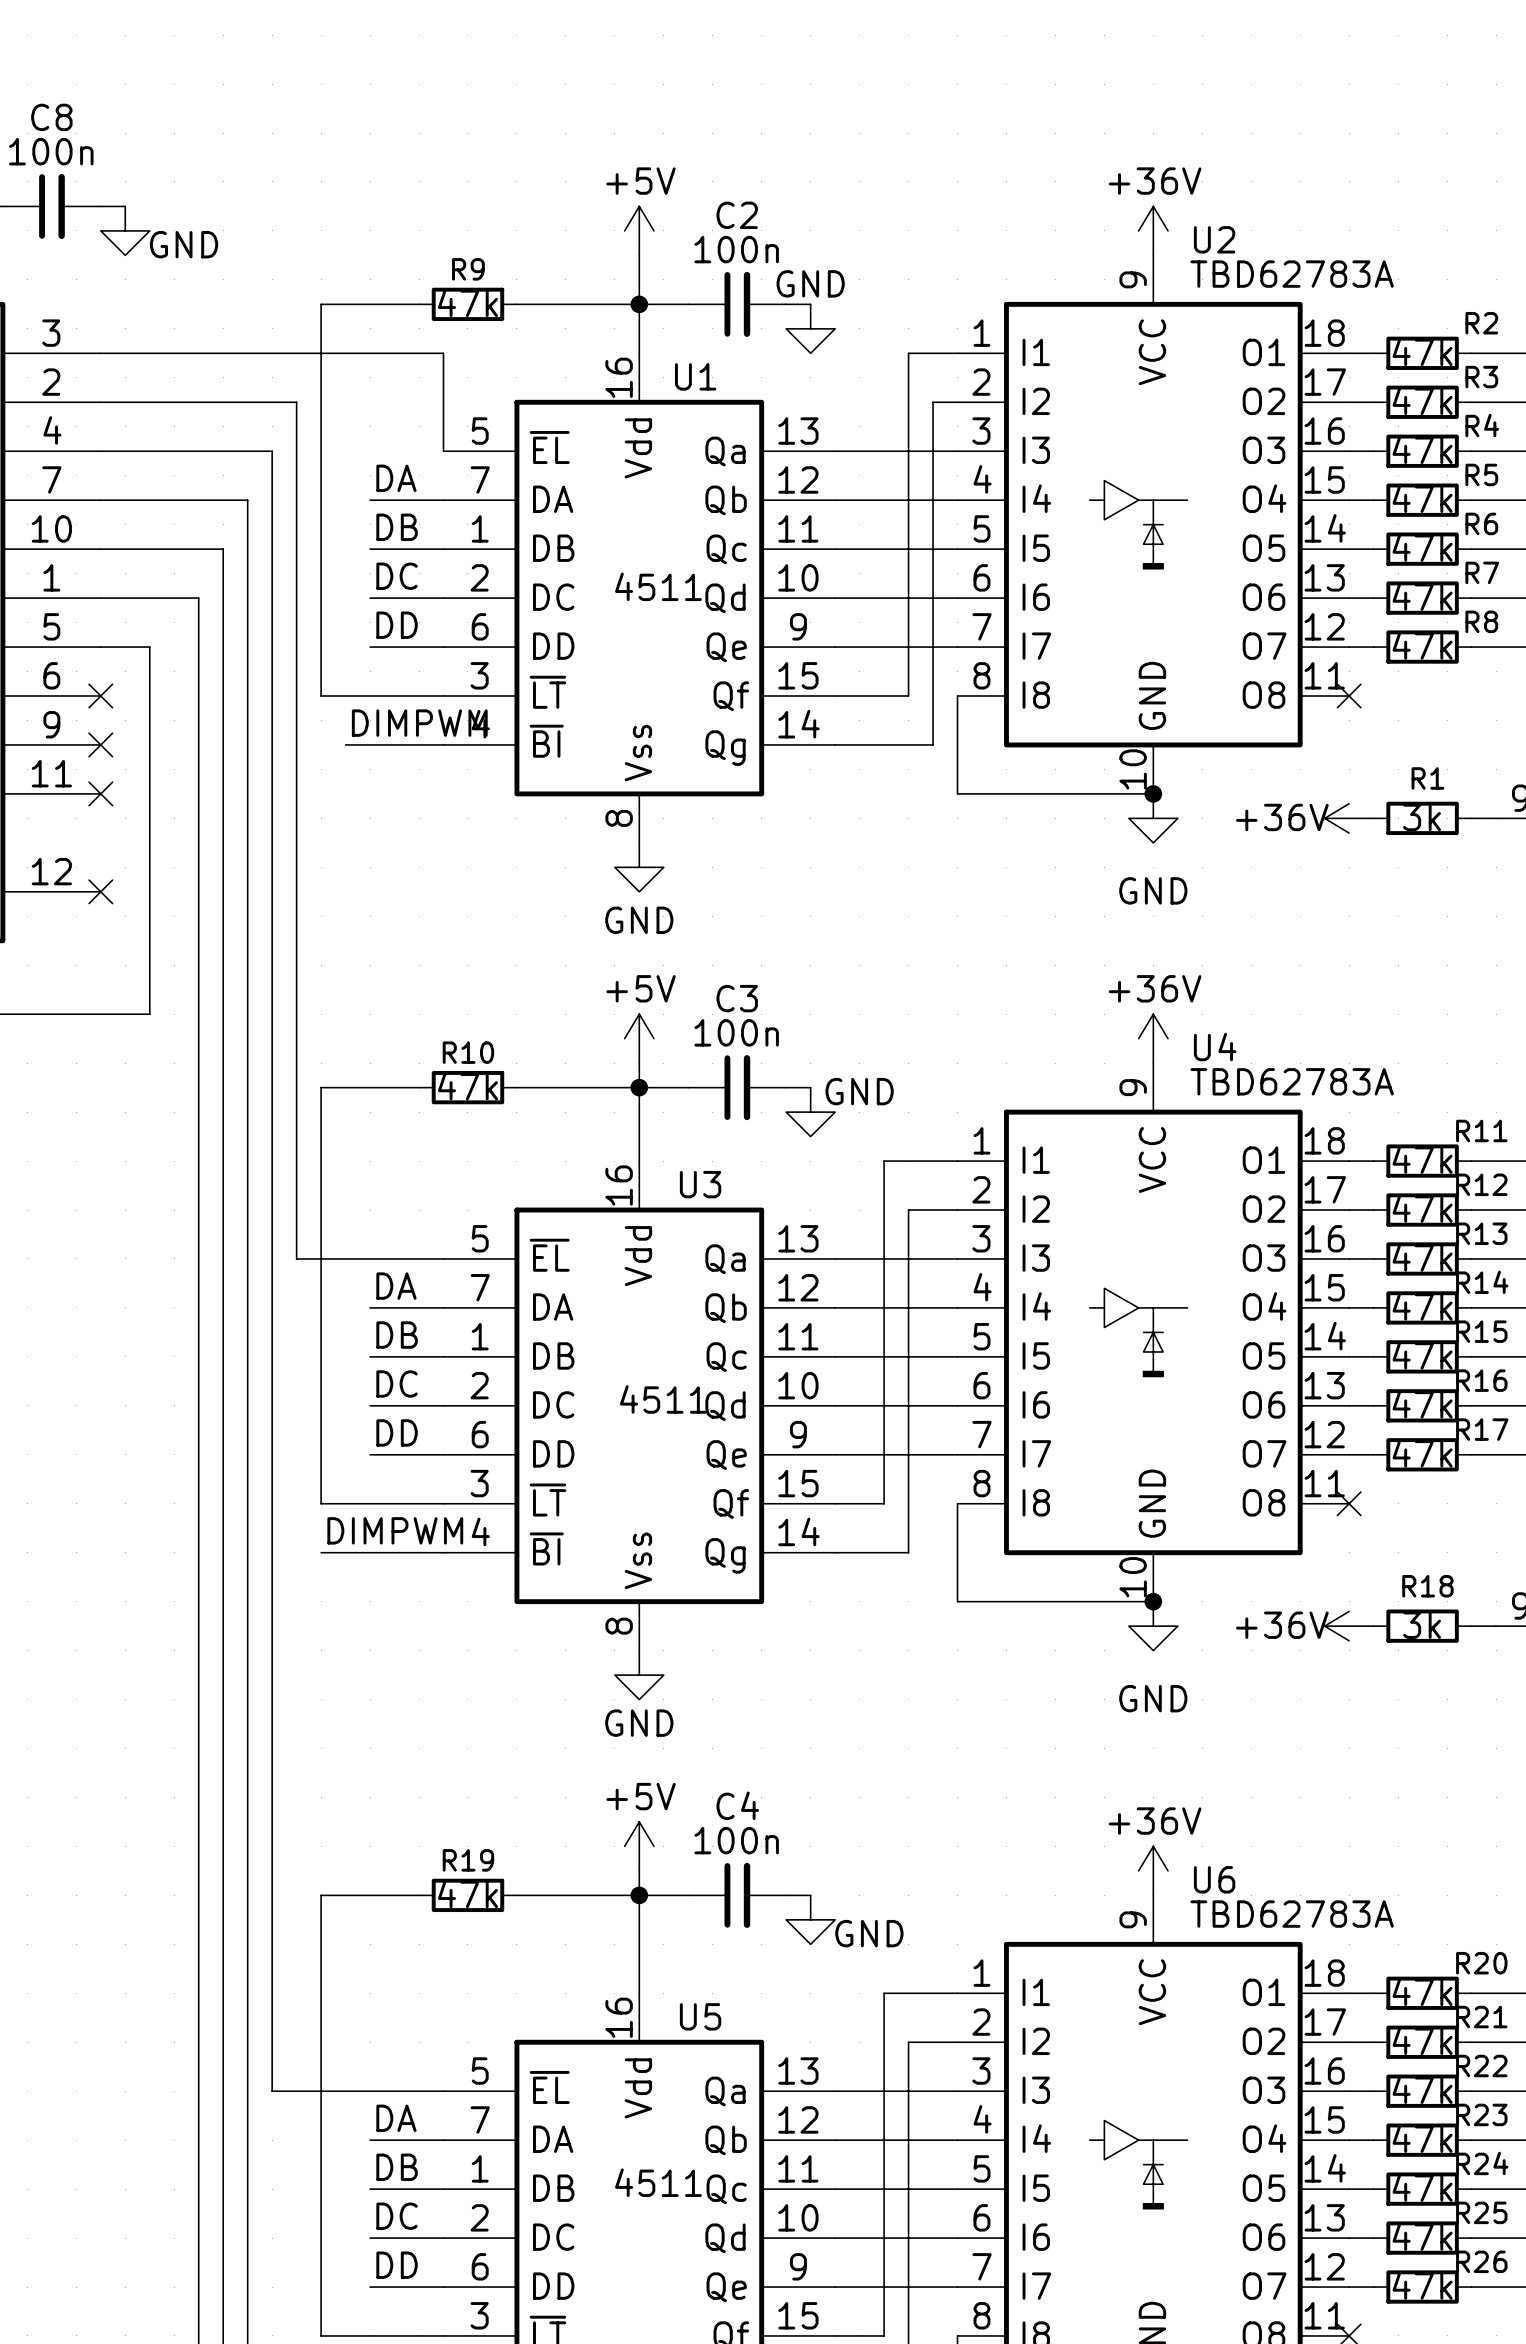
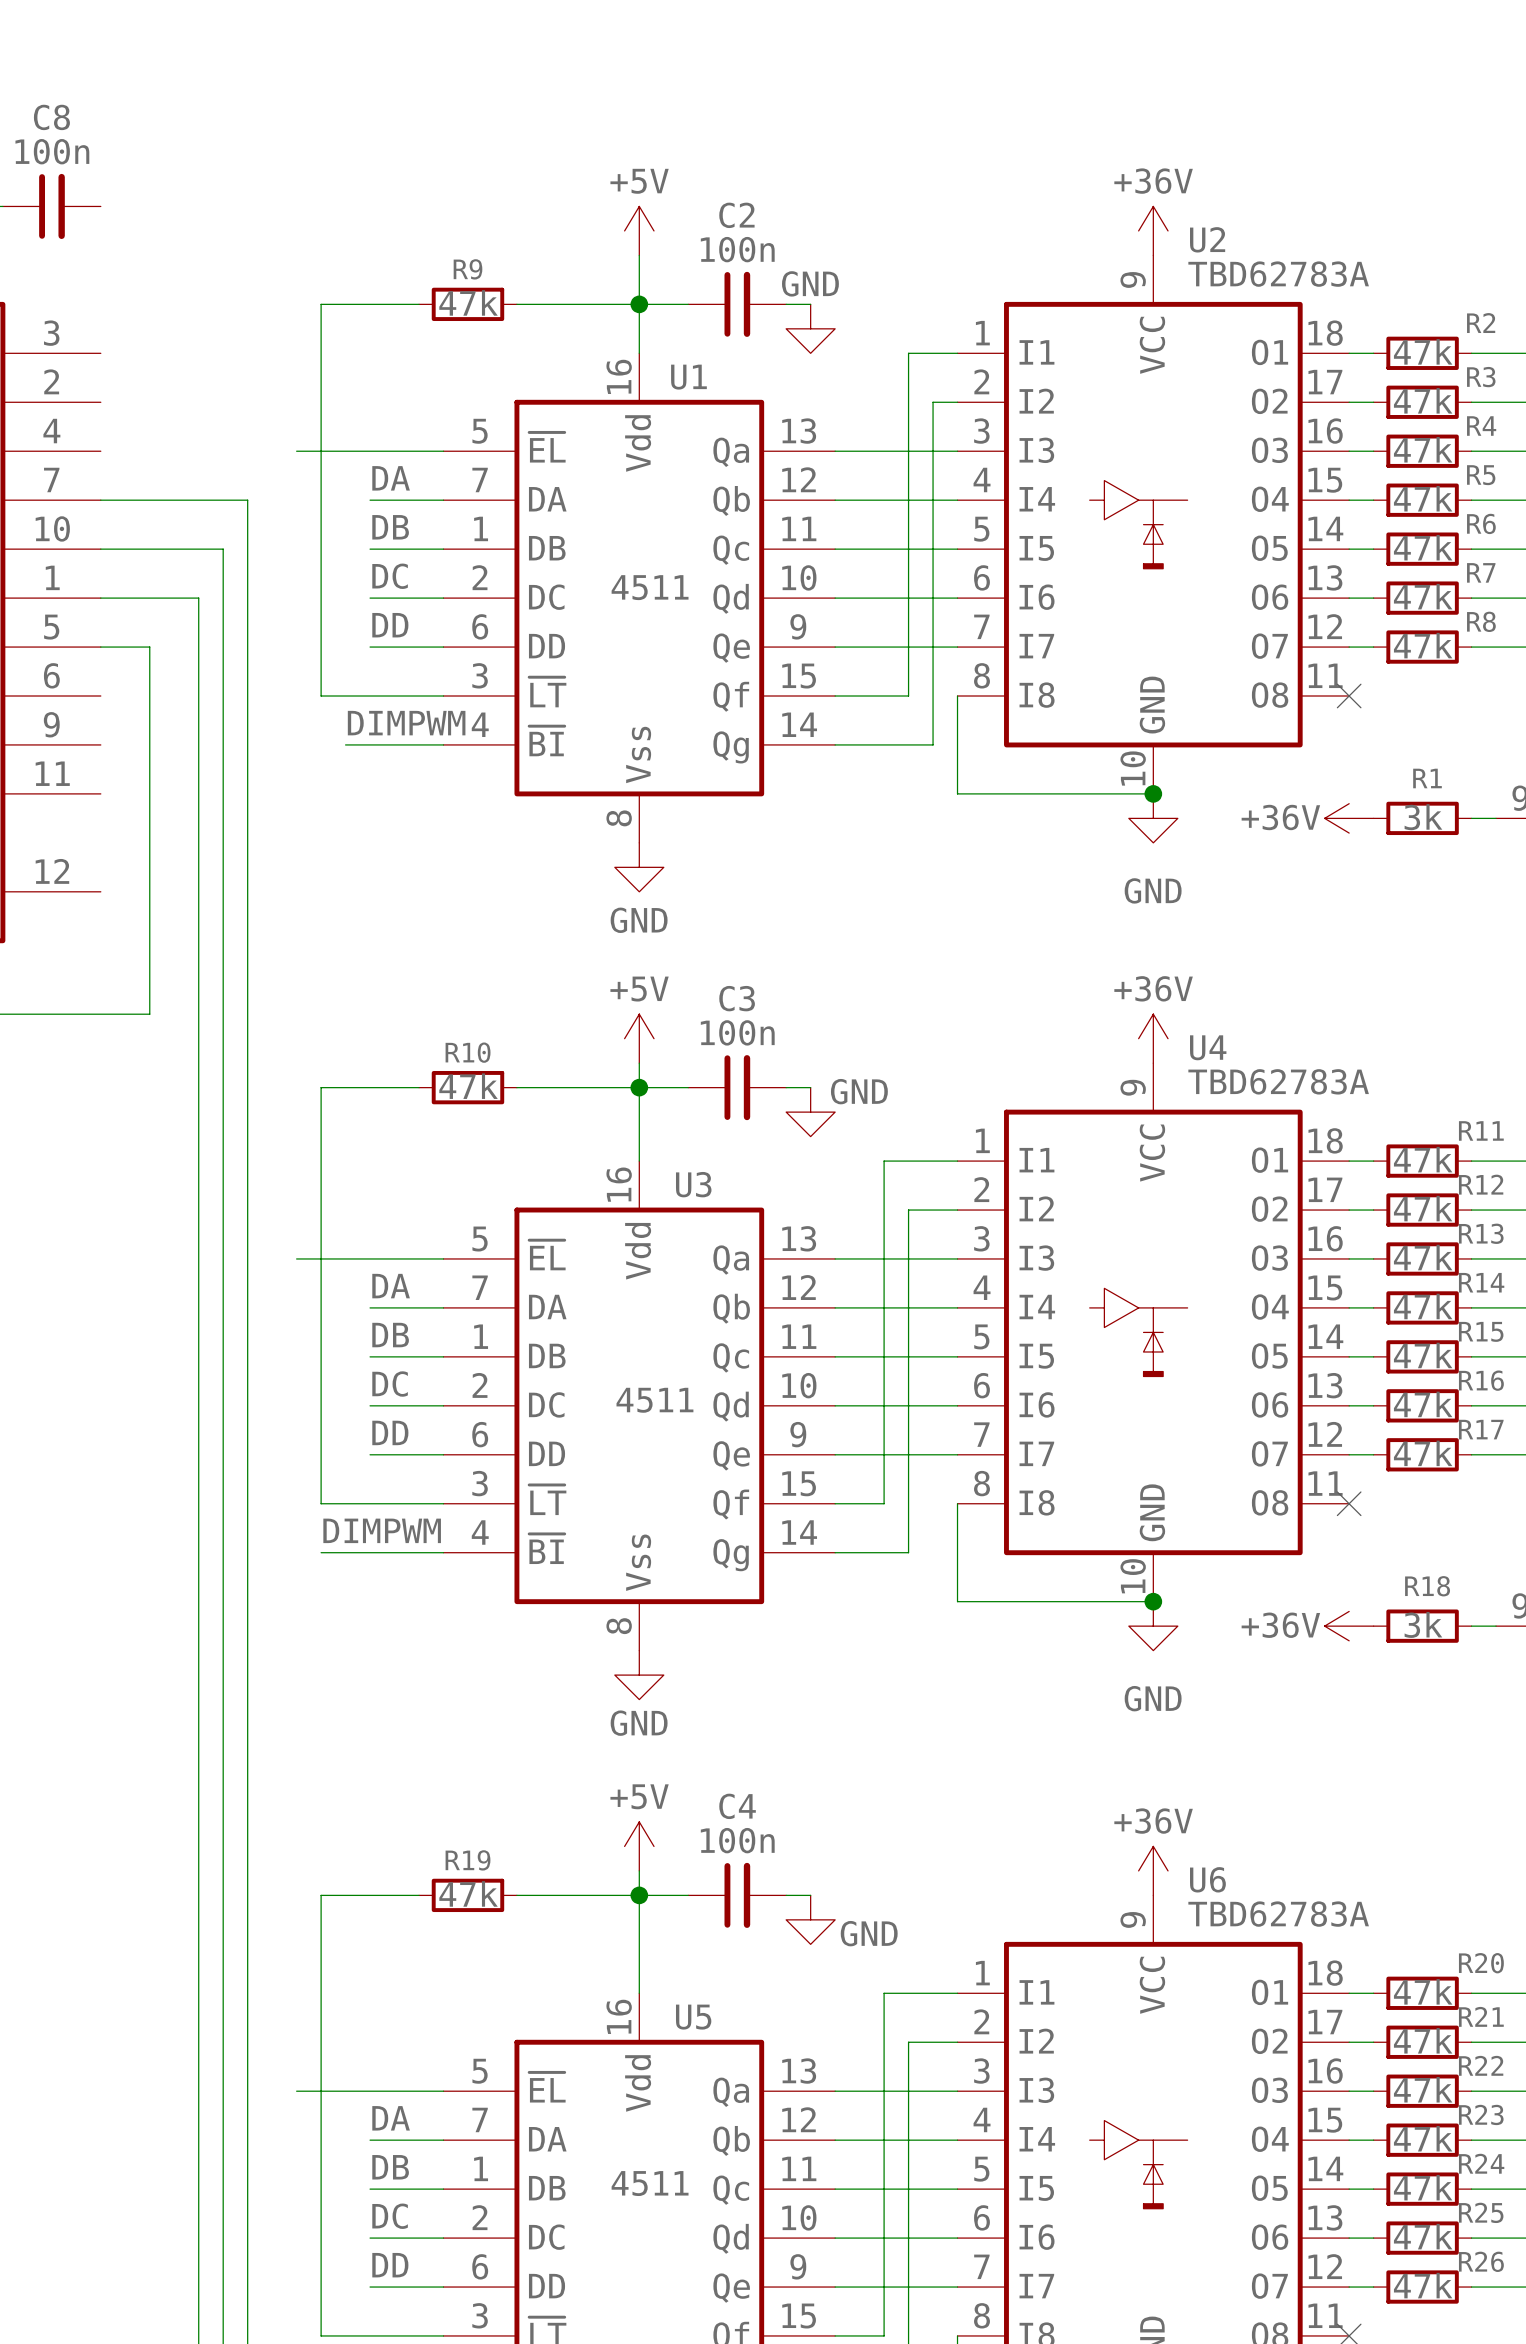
wire: (100, 206) (125, 206) -> none
power symbol: GND (125, 230) -> none
wire: (100, 353) (443, 353) (443, 451) -> (296, 451) (443, 451)
wire: (100, 402) (296, 402) (296, 1258) -> none
wire: (100, 451) (272, 451) (272, 2091) (296, 2091) -> none
no-connect mark: (100, 696) -> none
no-connect mark: (100, 744) -> none
no-connect mark: (100, 793) -> none
no-connect mark: (100, 891) -> none

